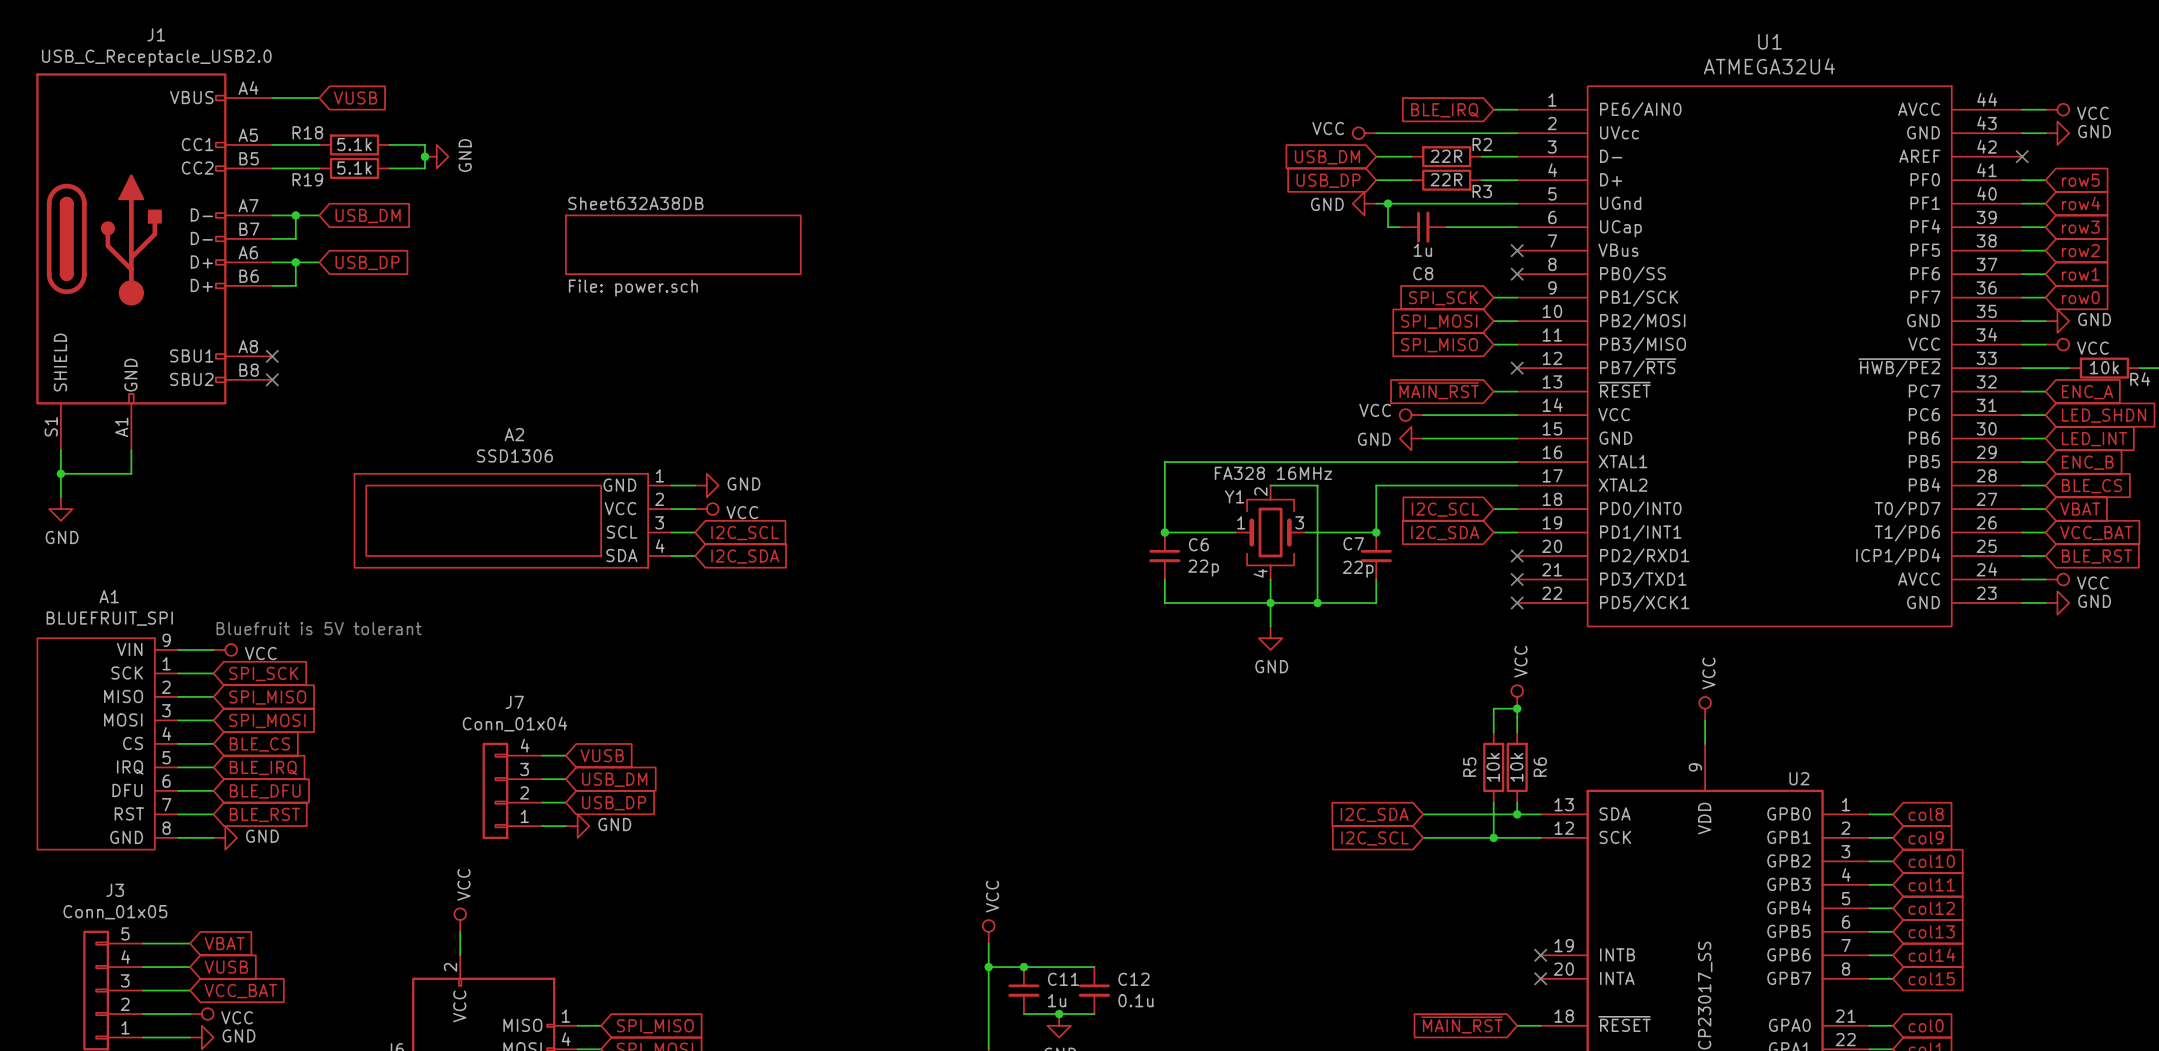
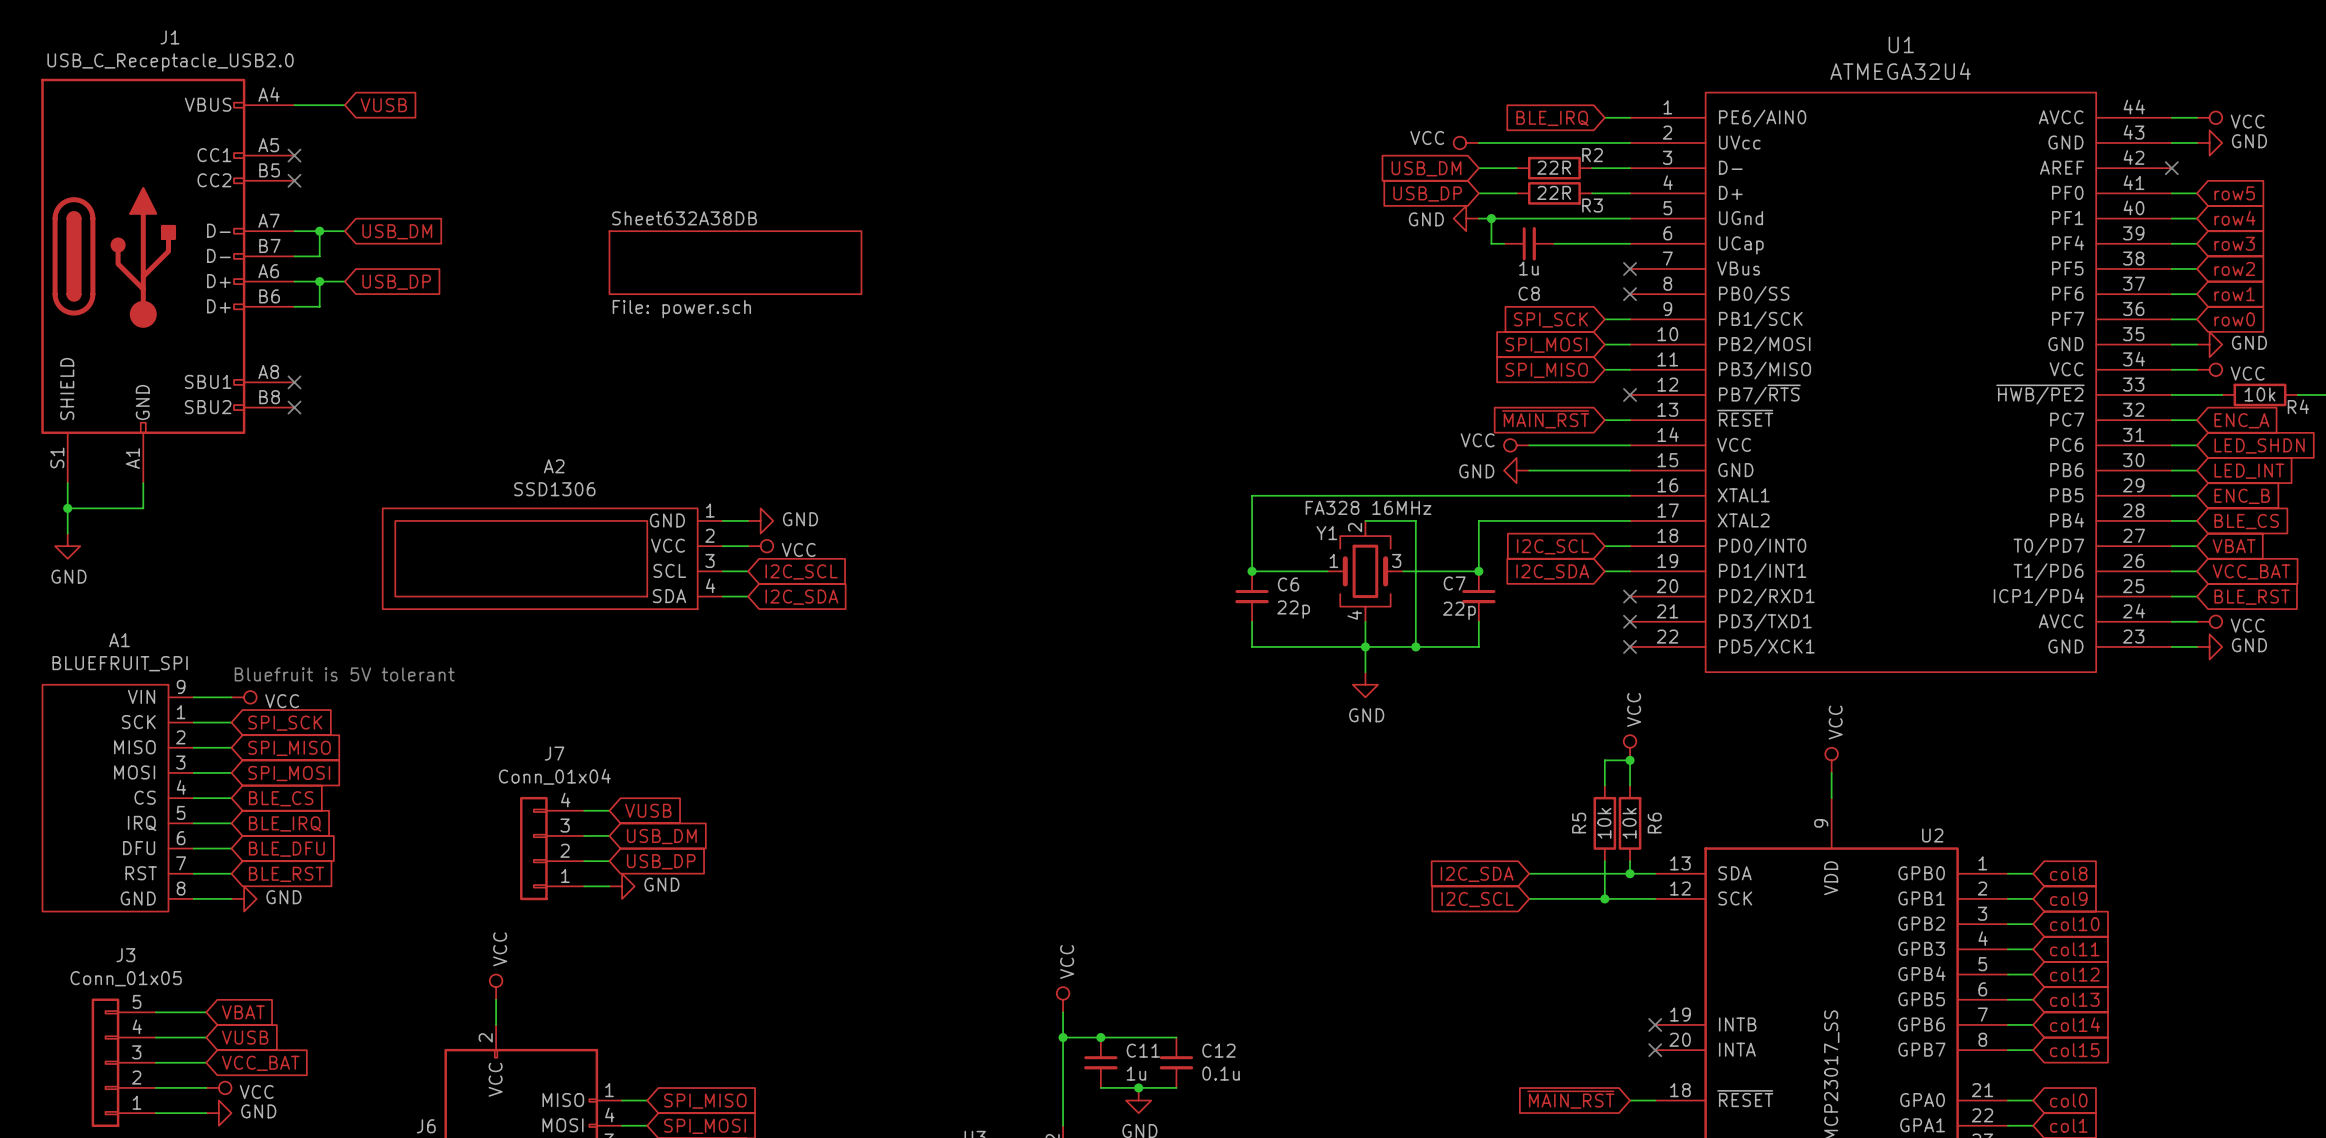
wire: (272, 144) (319, 144) -> none
no-connect mark: none -> (294, 155)
R18: 5.1k (354, 144) -> none
wire: (389, 144) (424, 144) (424, 168) (389, 168) -> none
junction: (424, 156) -> none
power symbol: GND (436, 156) -> none
wire: (272, 168) (319, 168) -> none
no-connect mark: none -> (294, 180)
R19: 5.1k (354, 168) -> none

